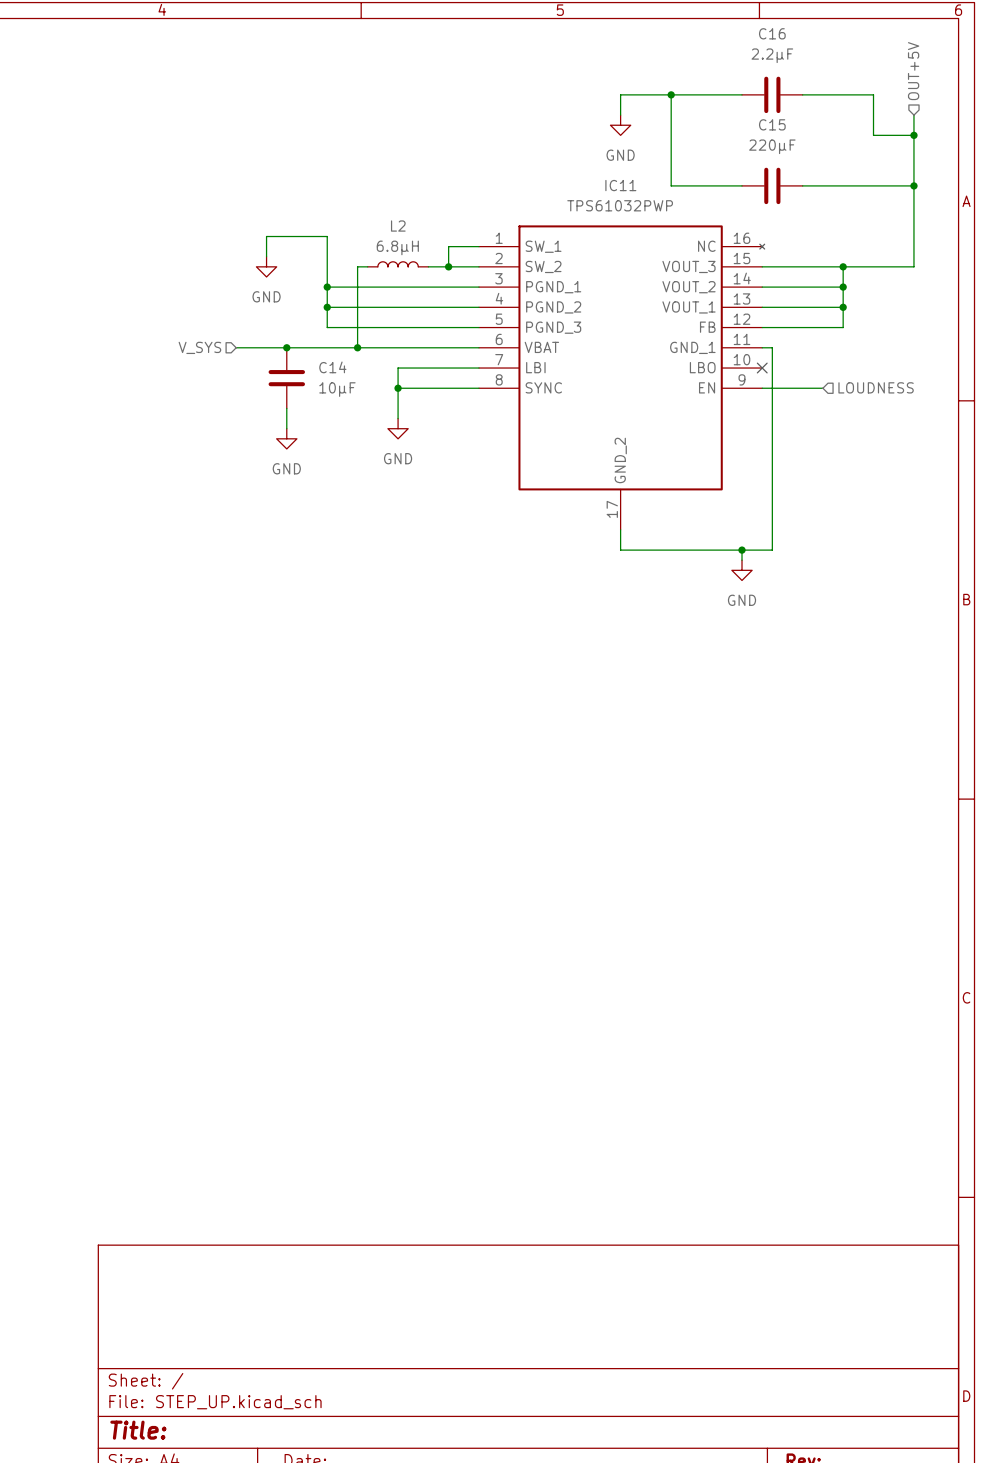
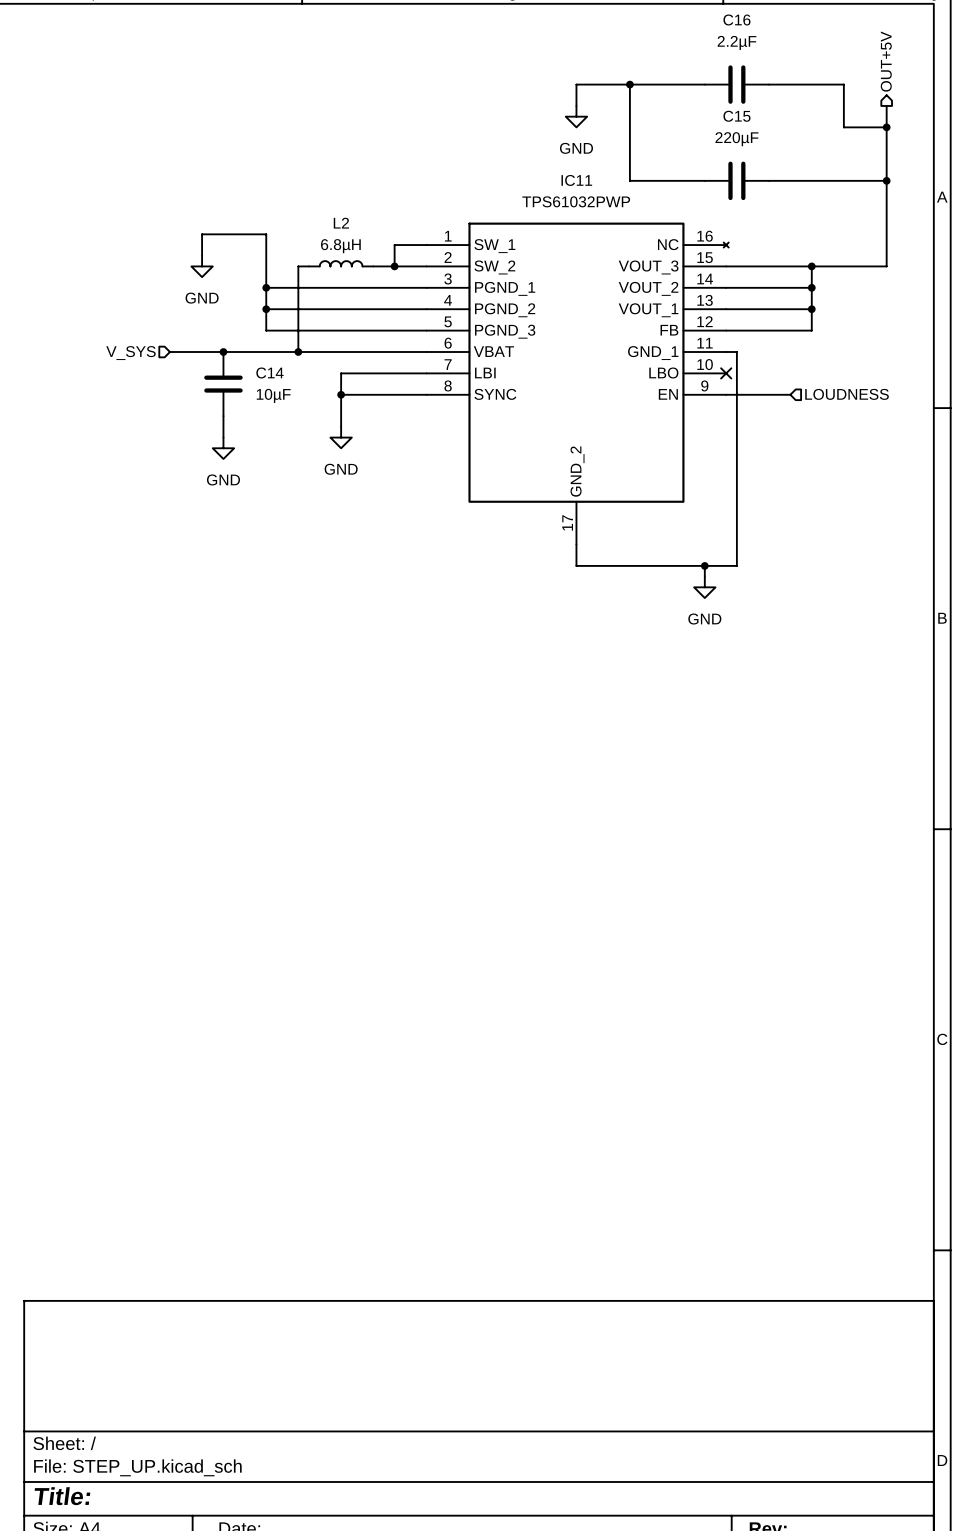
hierarchical label shape: input (913, 71) -> output (886, 61)

